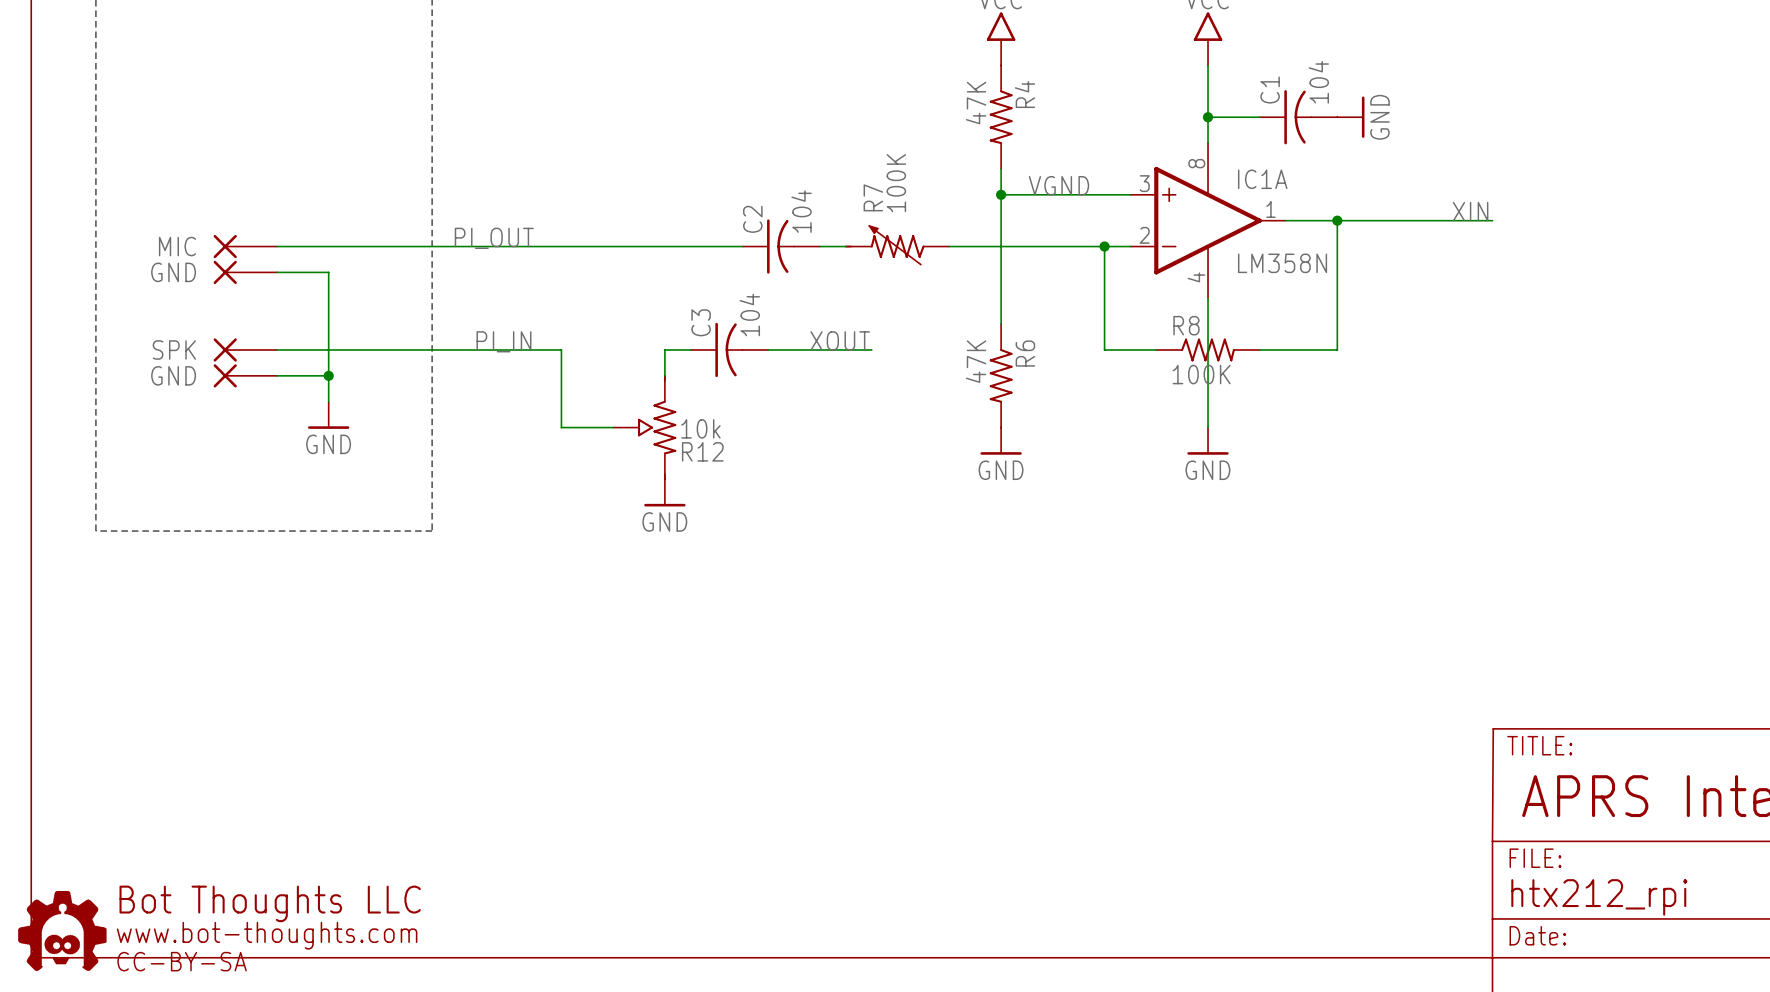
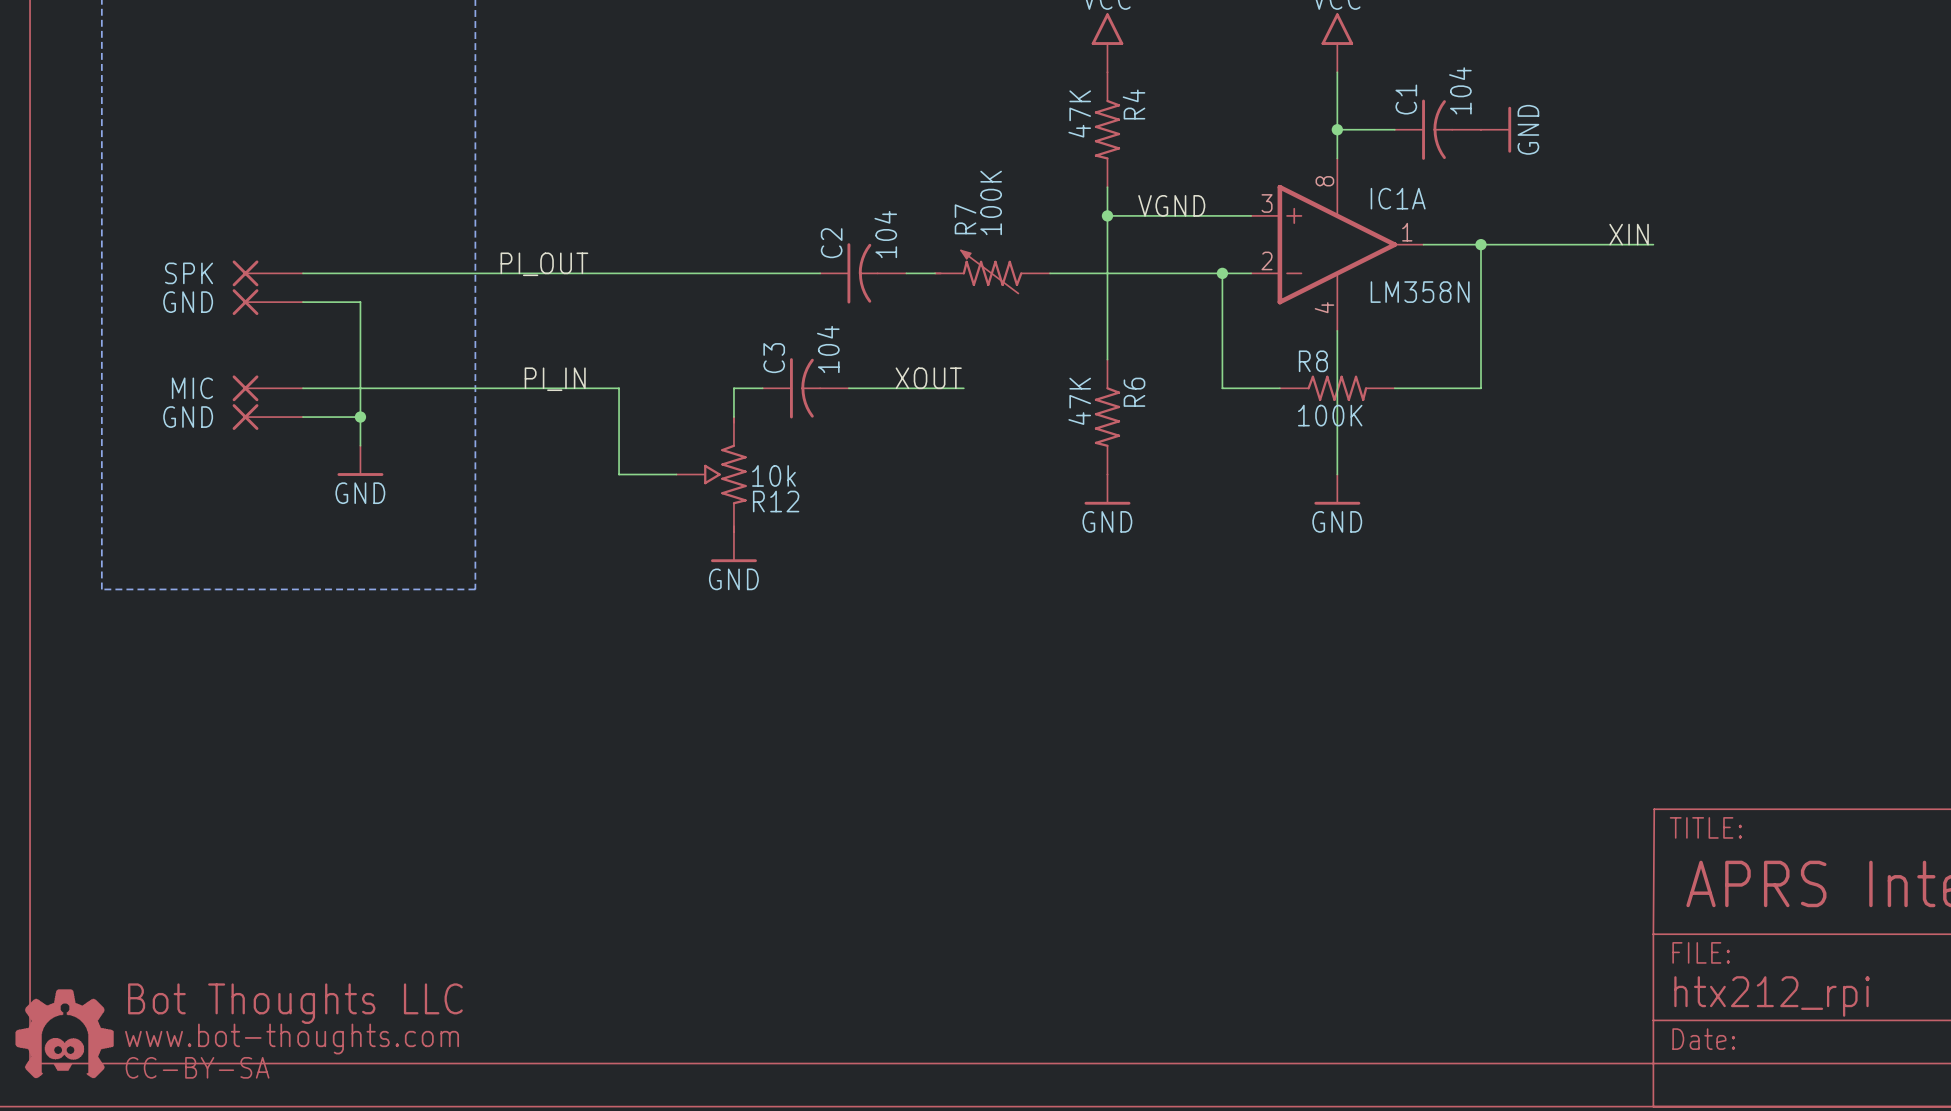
part value: MIC (177, 246) -> SPK (189, 273)
part value: SPK (174, 349) -> MIC (192, 388)

